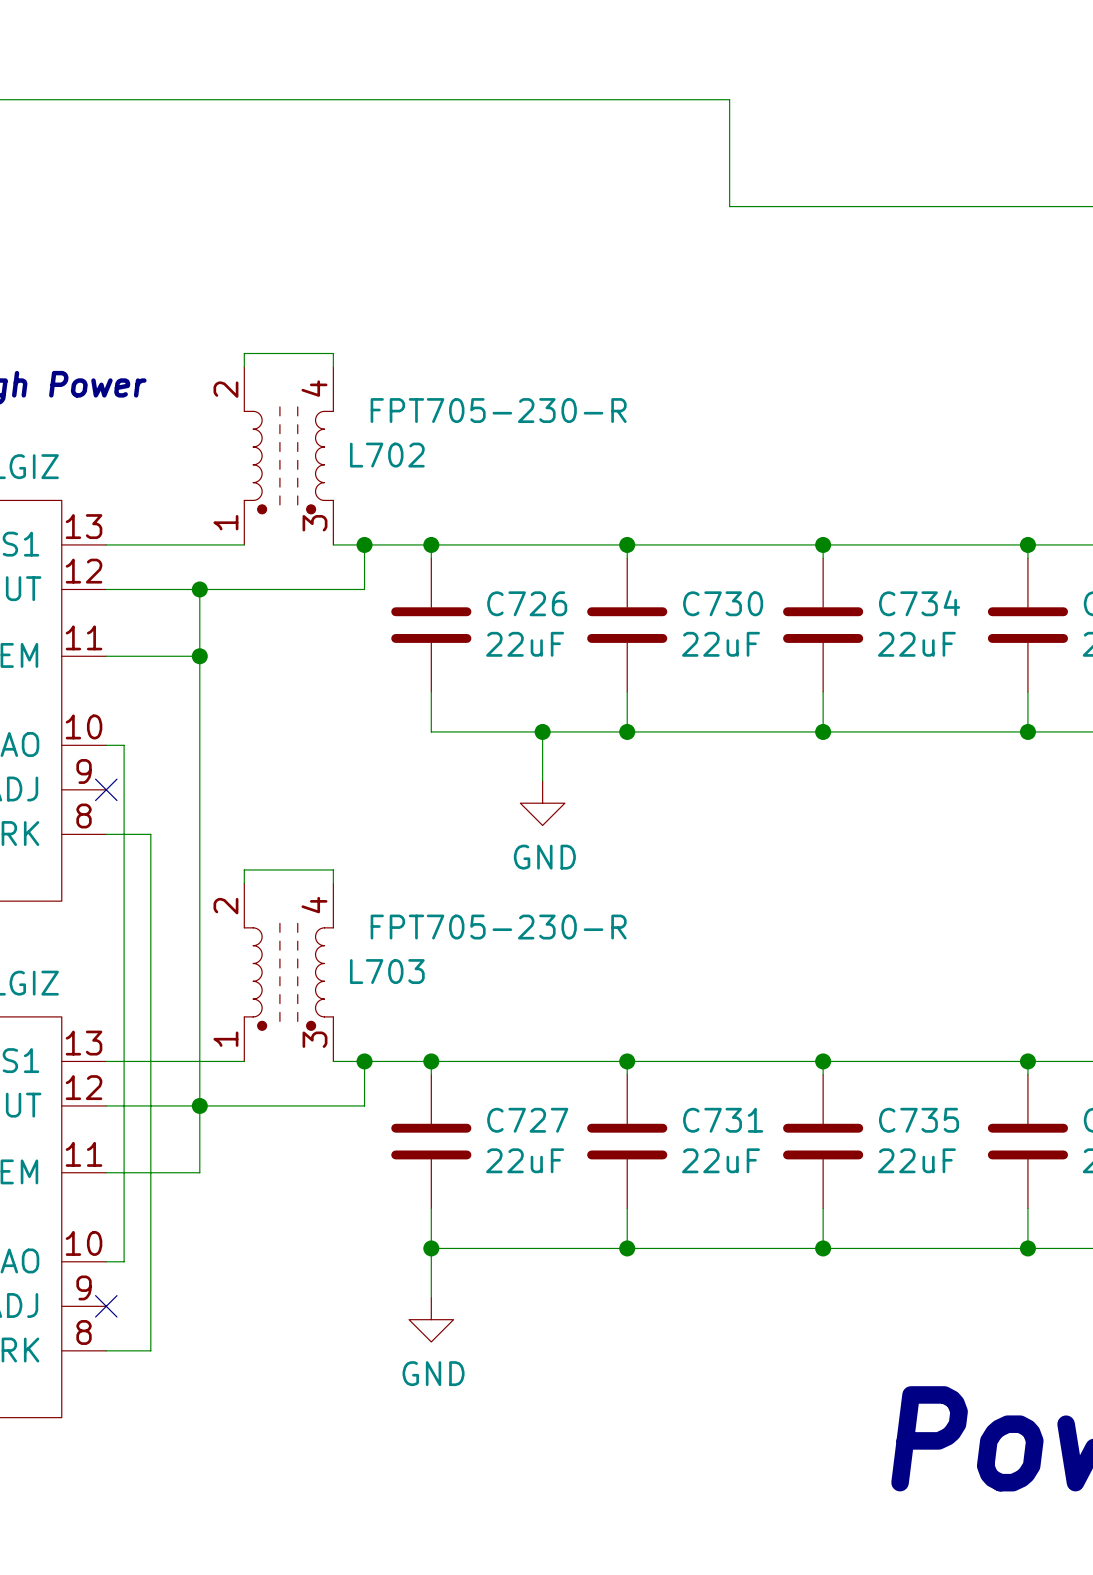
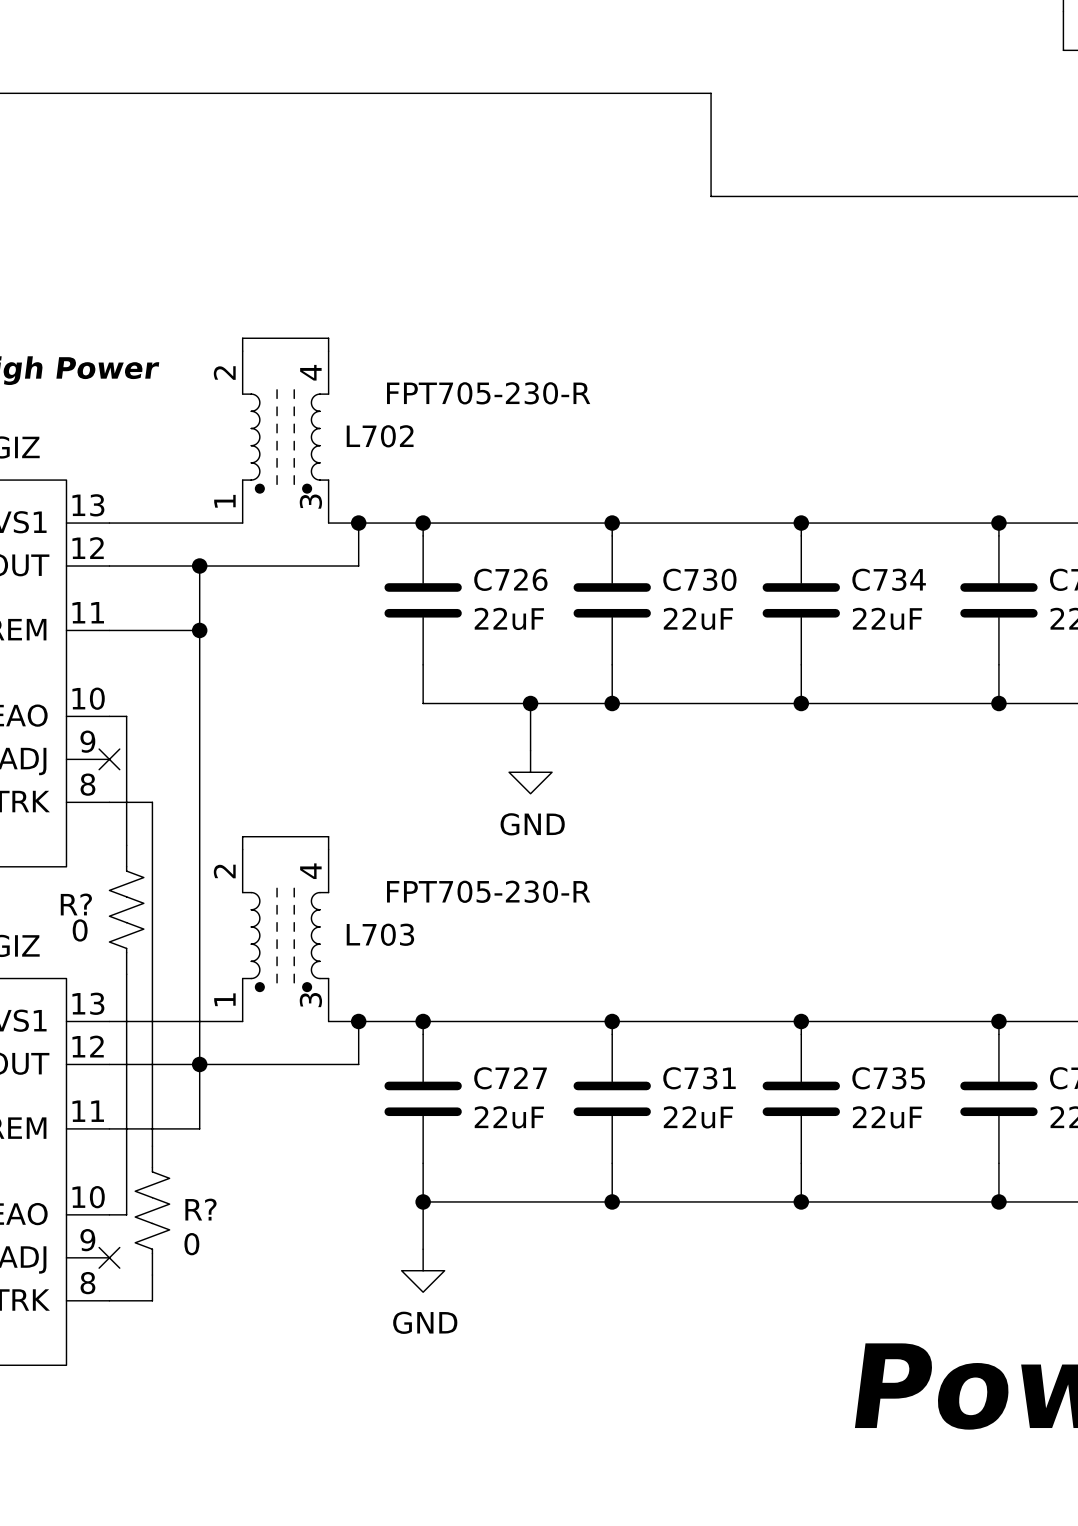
wire: (124, 878) (124, 1012) -> none
R?: none -> 0 (126, 909)
wire: (150, 1190) (150, 1324) -> none
R?: none -> 0 (152, 1210)

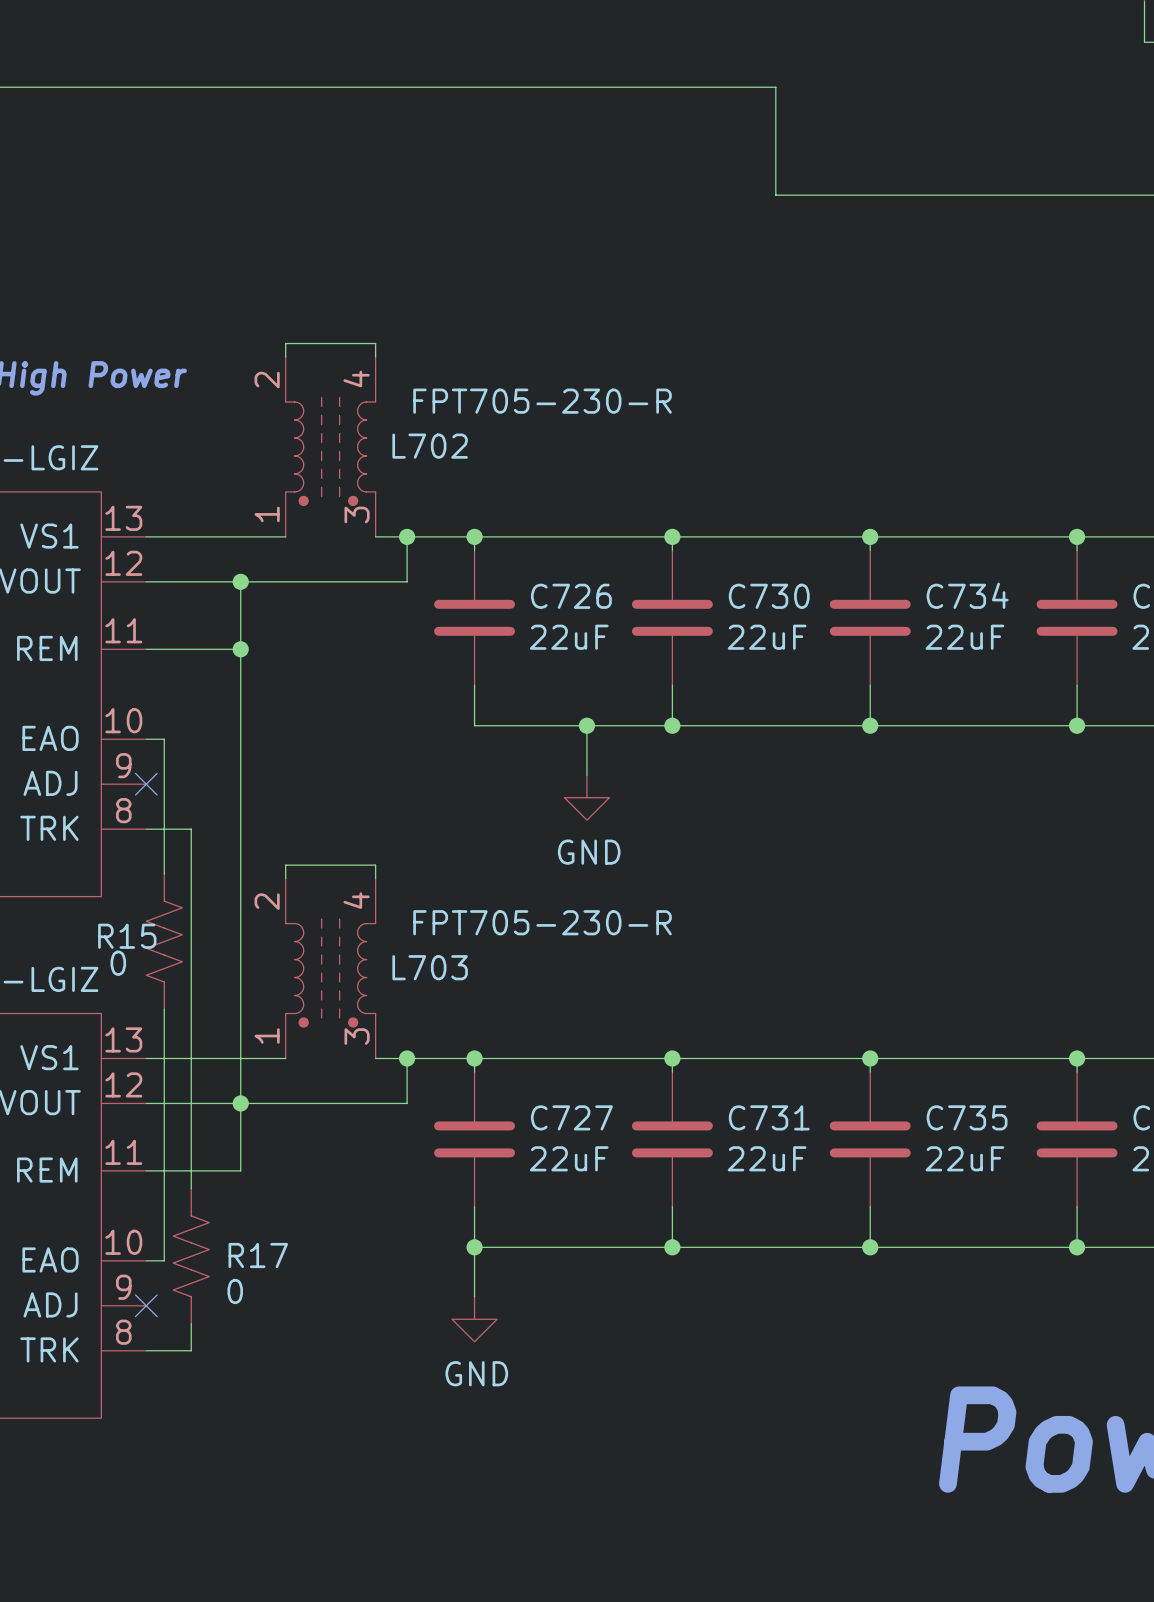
R? name: R? (76, 904) -> R15 (127, 936)
R? name: R? (200, 1209) -> R17 (258, 1255)

